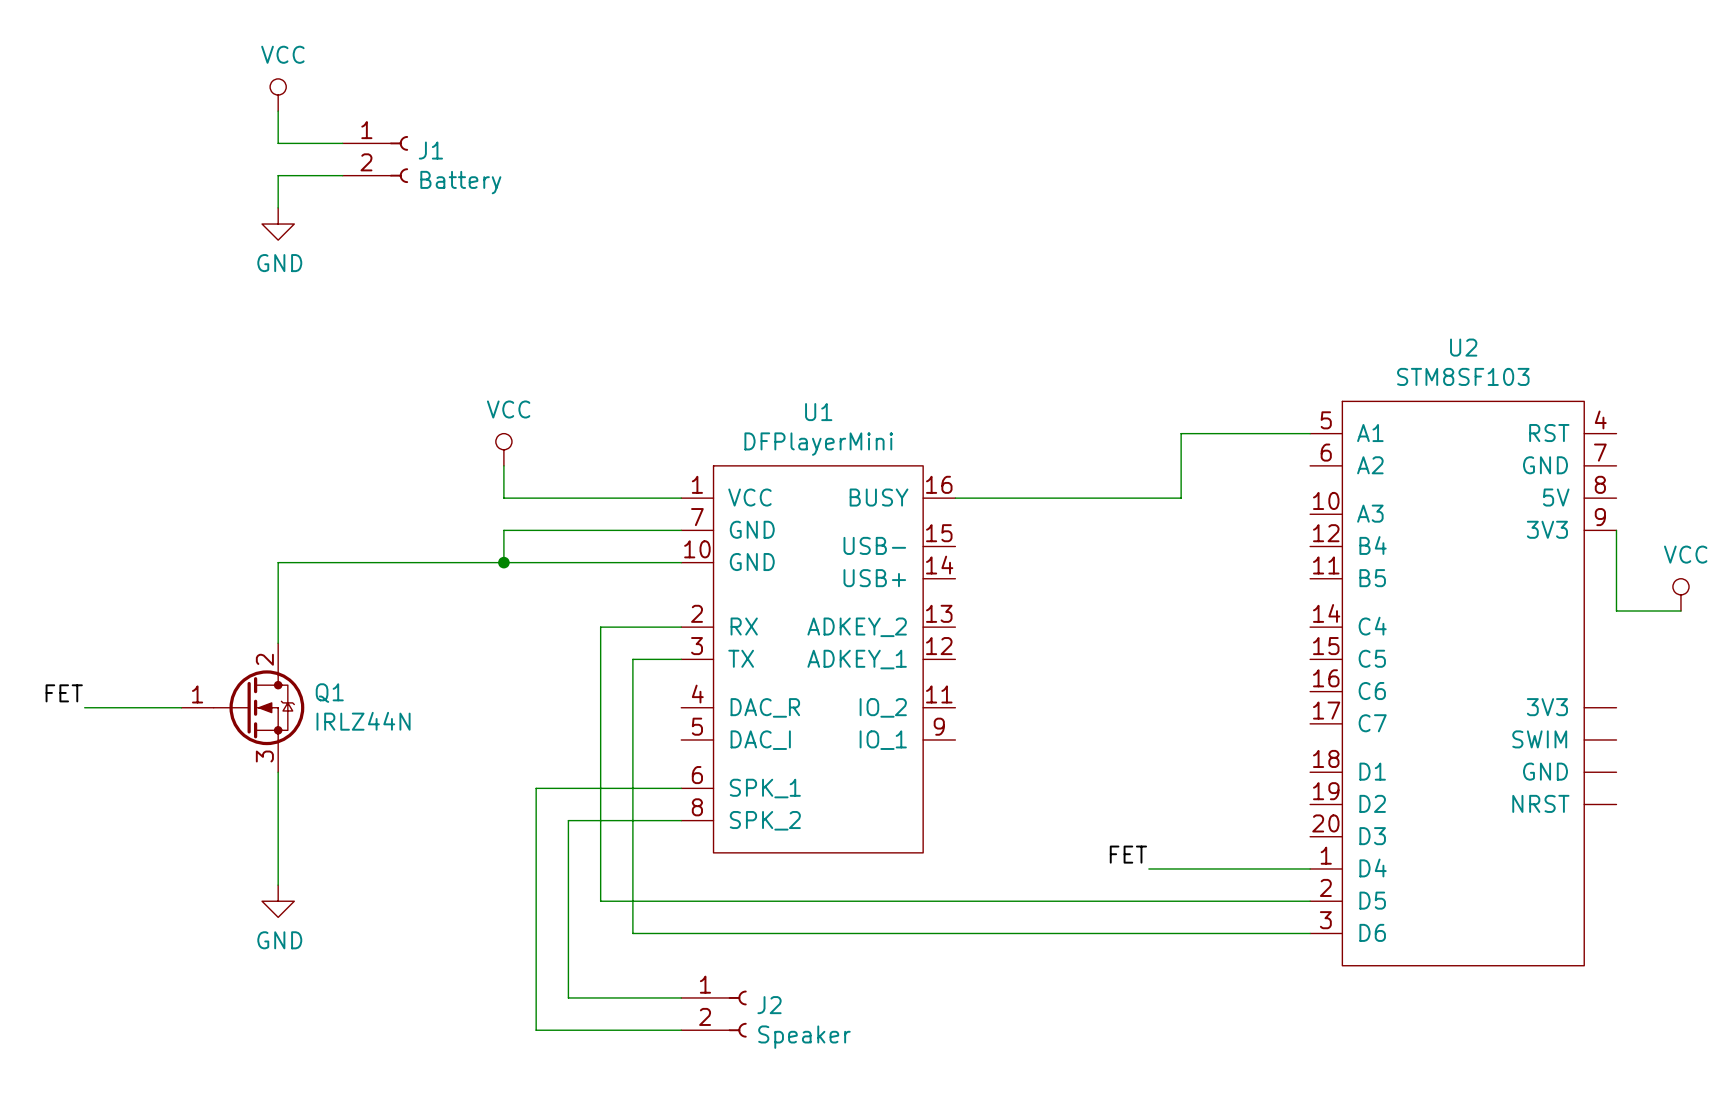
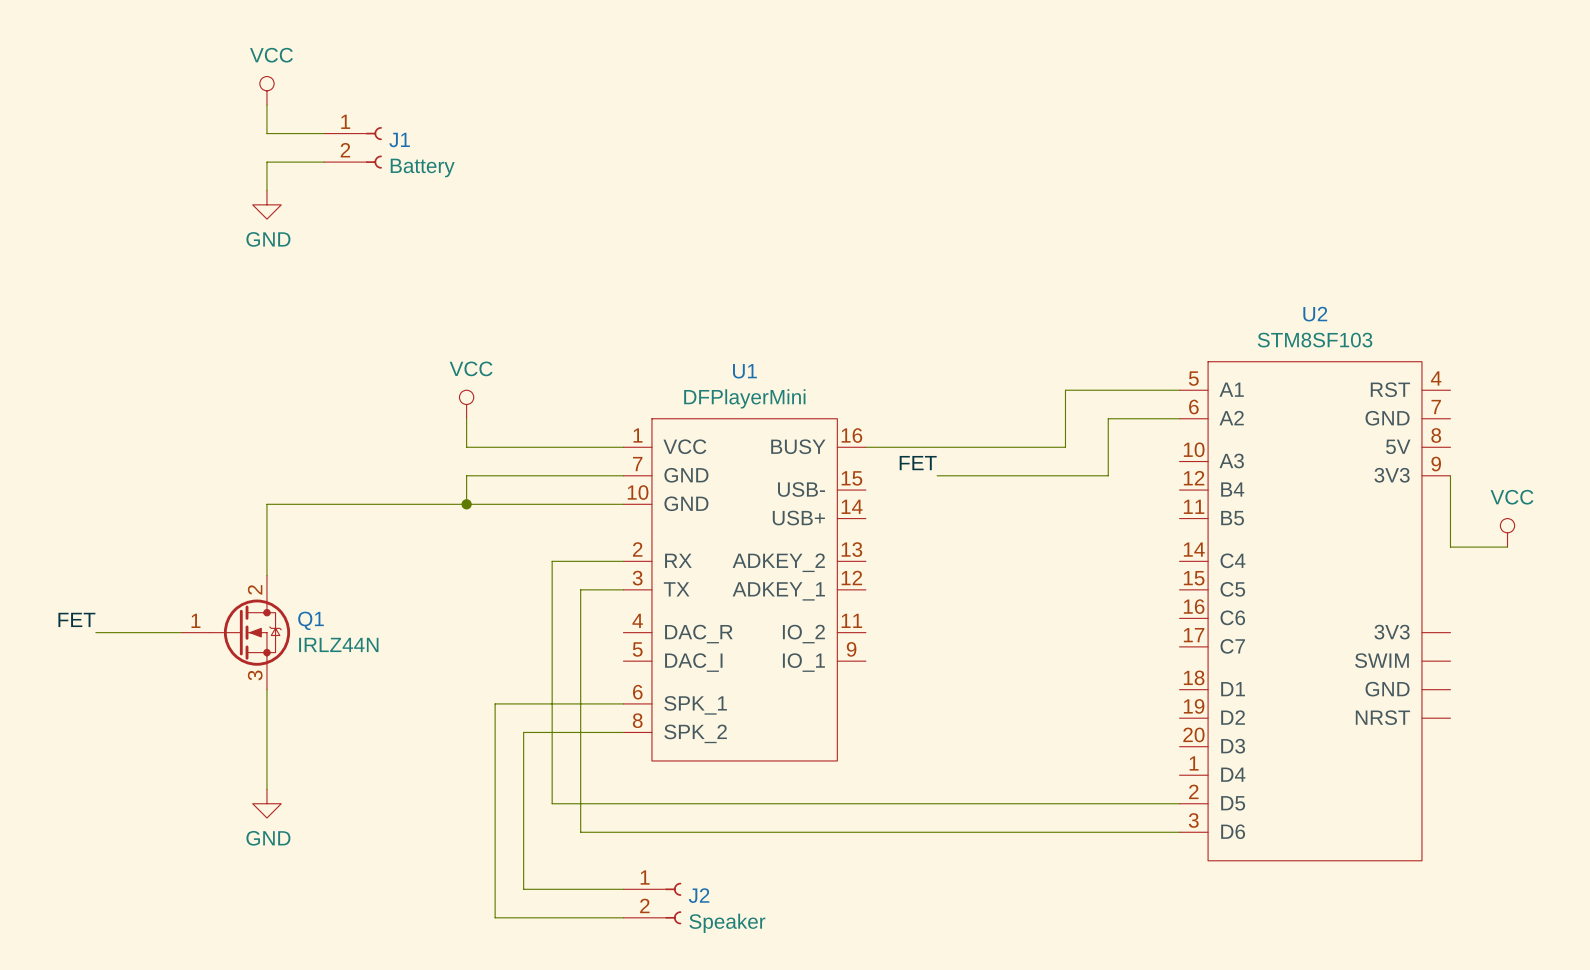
wire: none -> (1179, 418) (1108, 418) (1108, 475) (937, 475)
label: none -> FET (918, 463)
label: FET (1128, 854) -> none
wire: (1148, 868) (1310, 868) -> none

